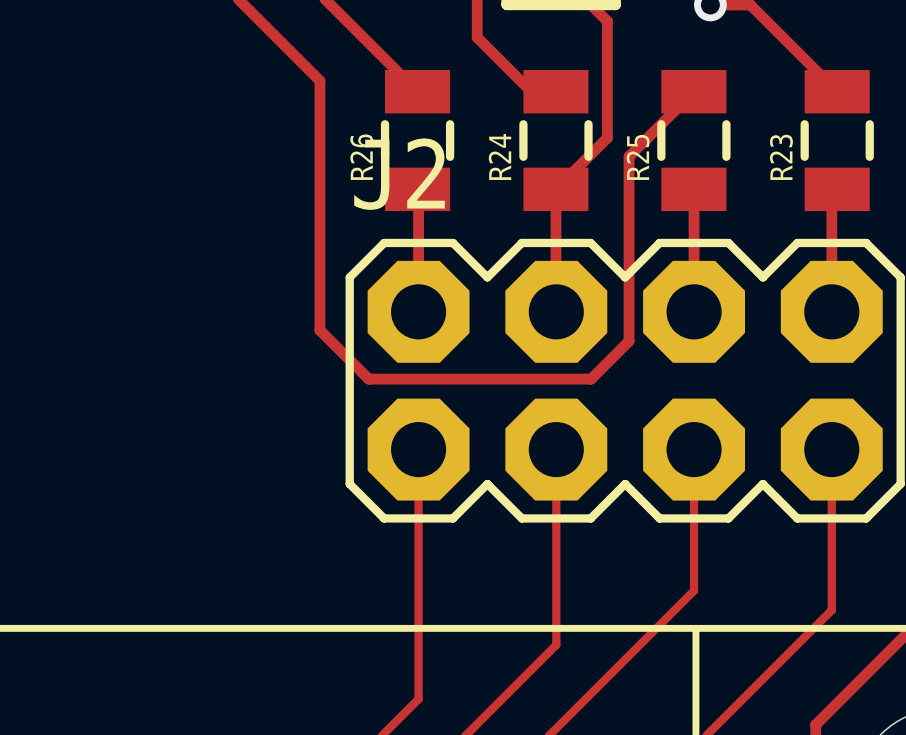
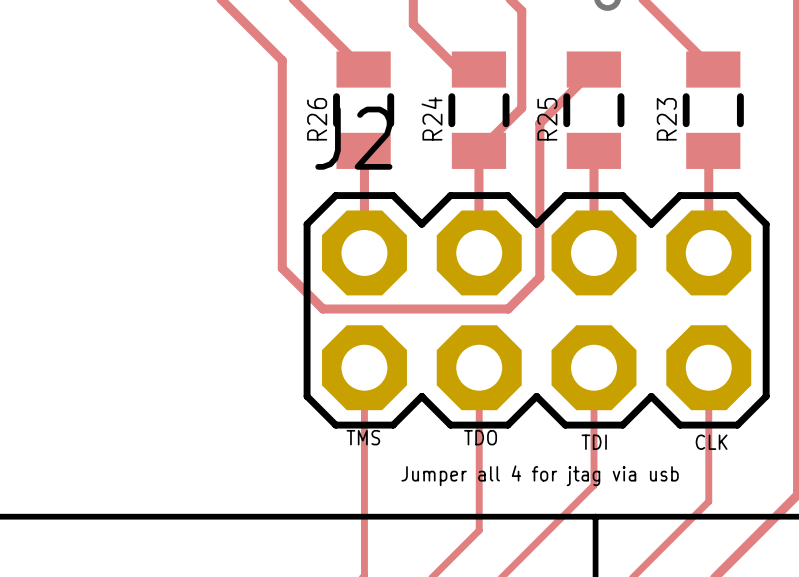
text: none -> TMS (363, 437)
text: none -> TDO (480, 437)
text: none -> TDI (594, 442)
text: none -> CLK (711, 442)
text: none -> Jumper all 4 for jtag via usb (540, 475)

